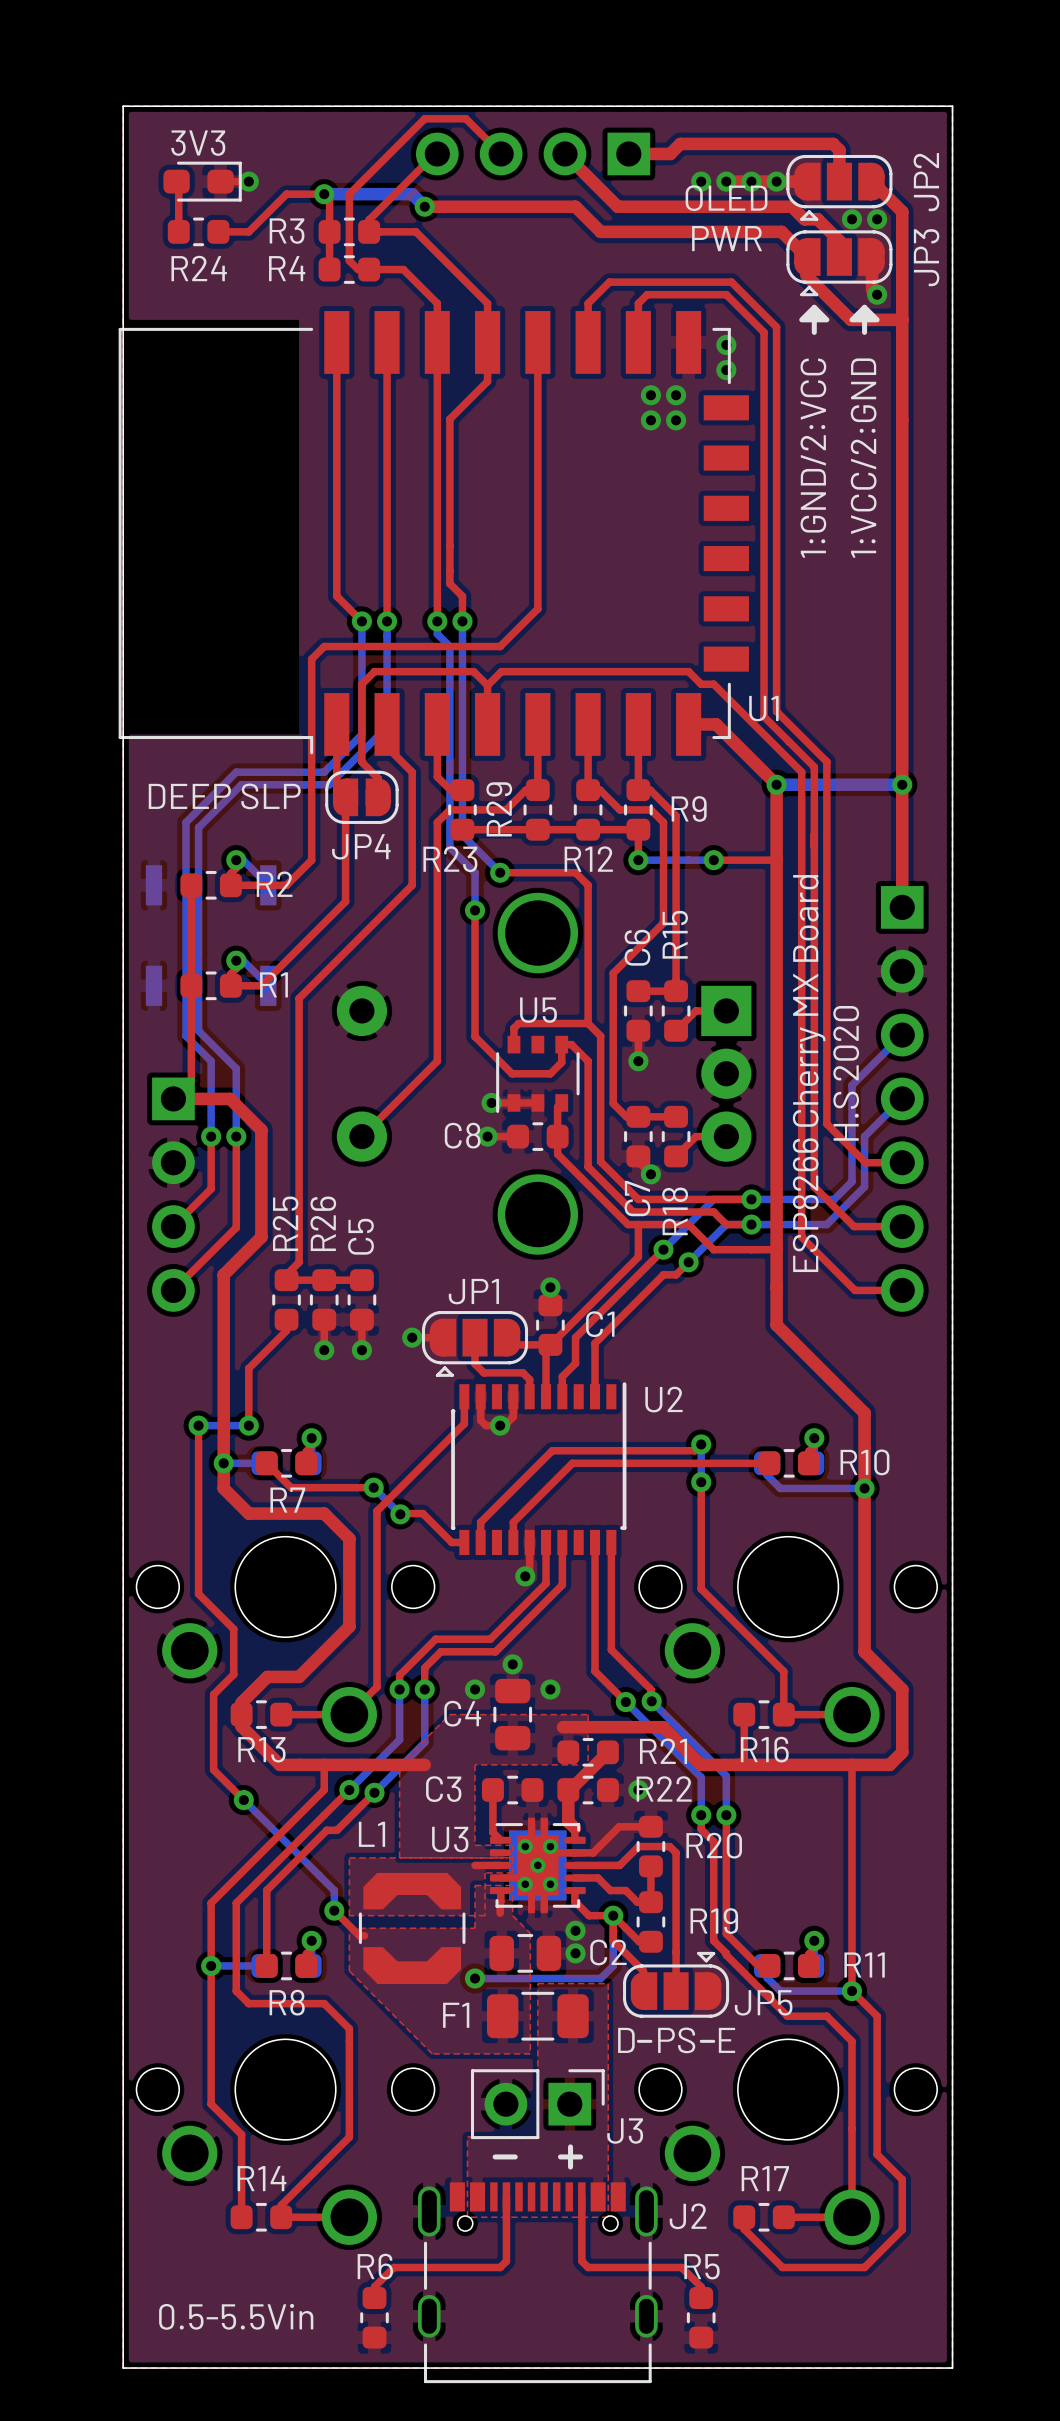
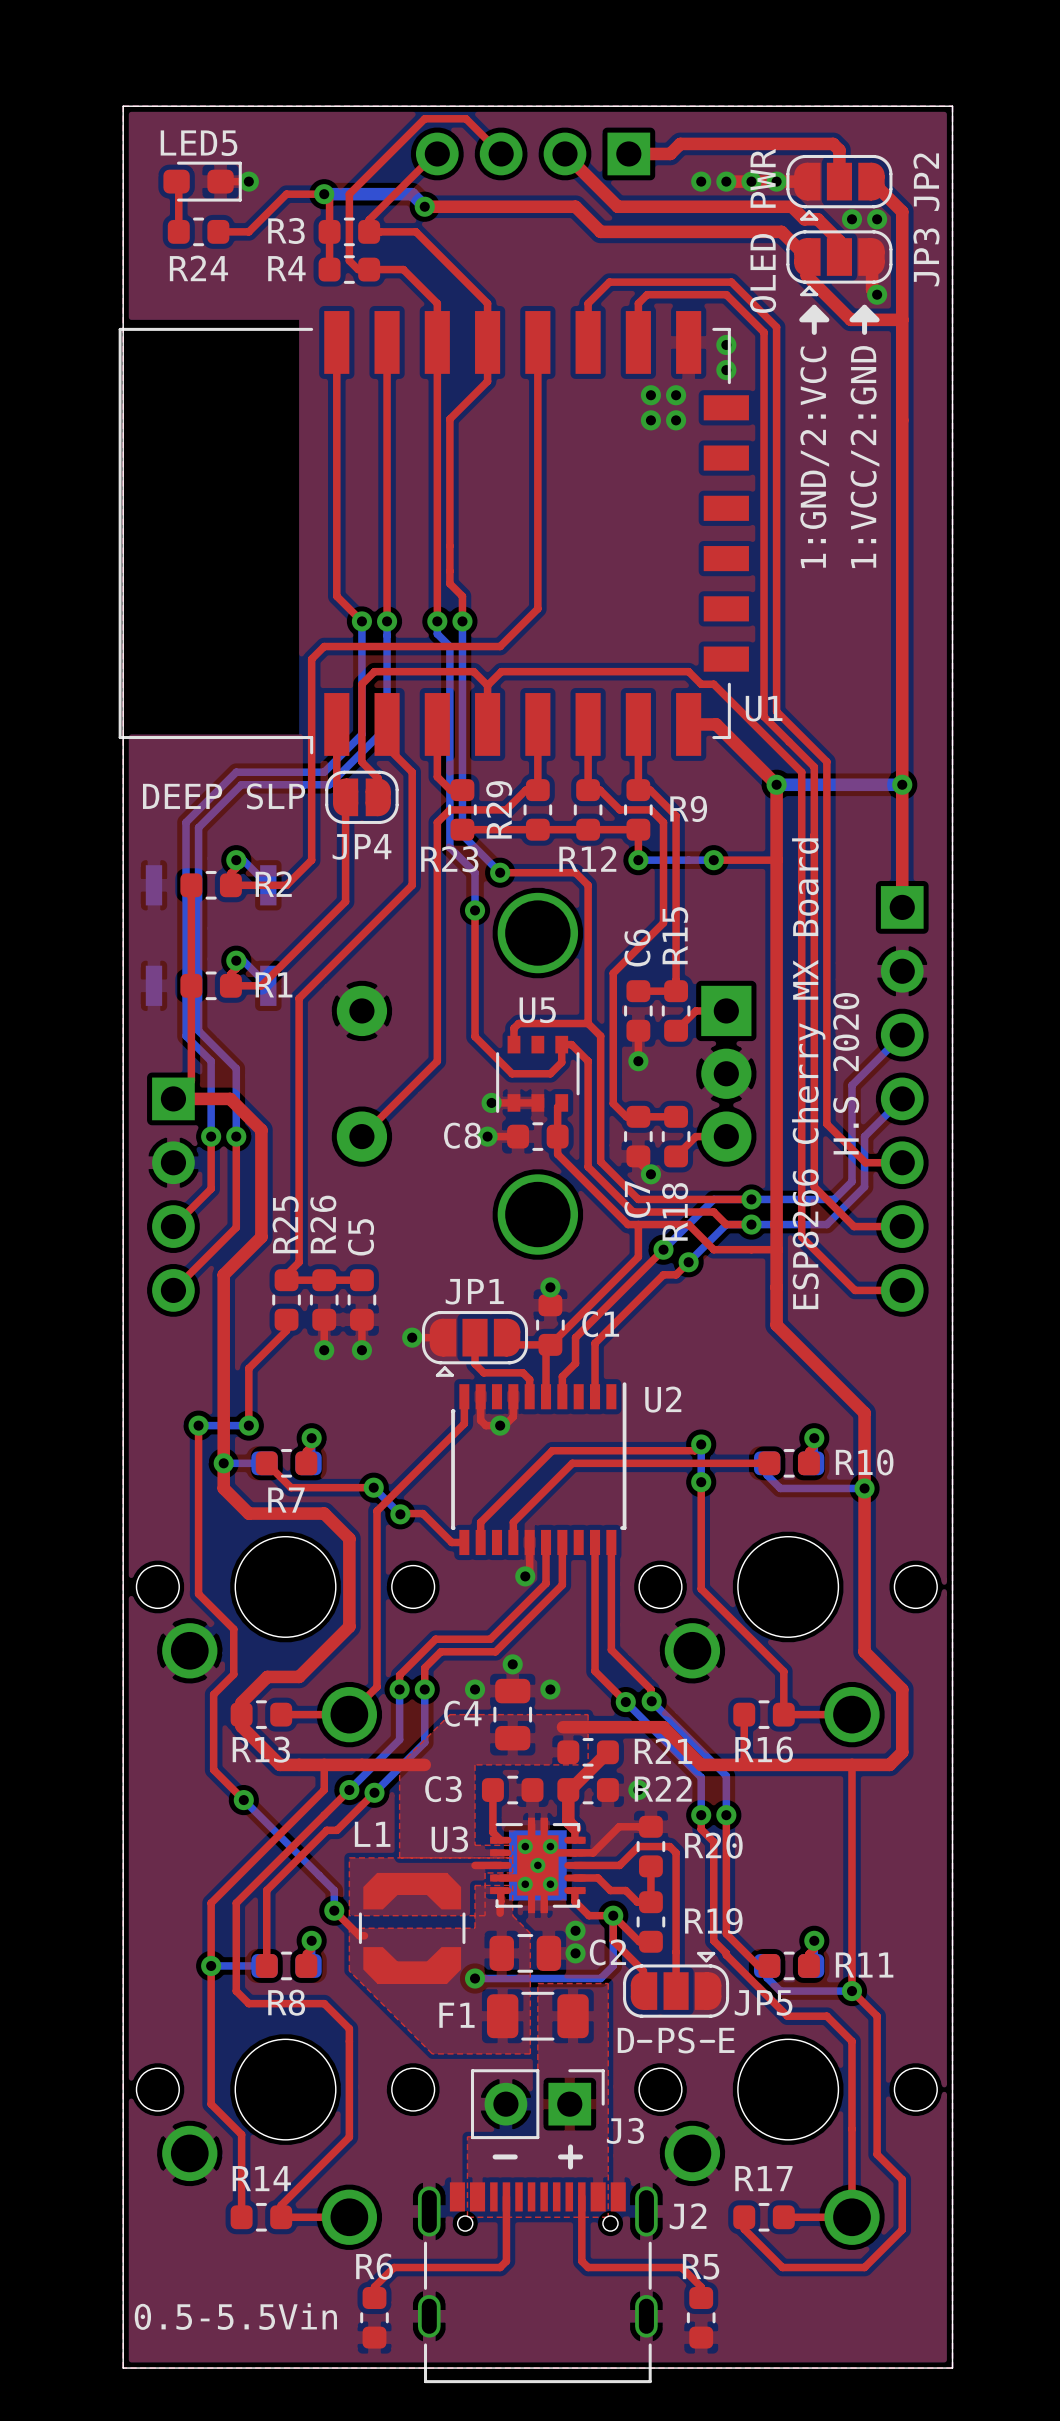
3V3 name: 3V3 (198, 143) -> LED5 (199, 143)
text: OLED (726, 198) -> OLED PWR (763, 230)
text: PWR (727, 238) -> none

